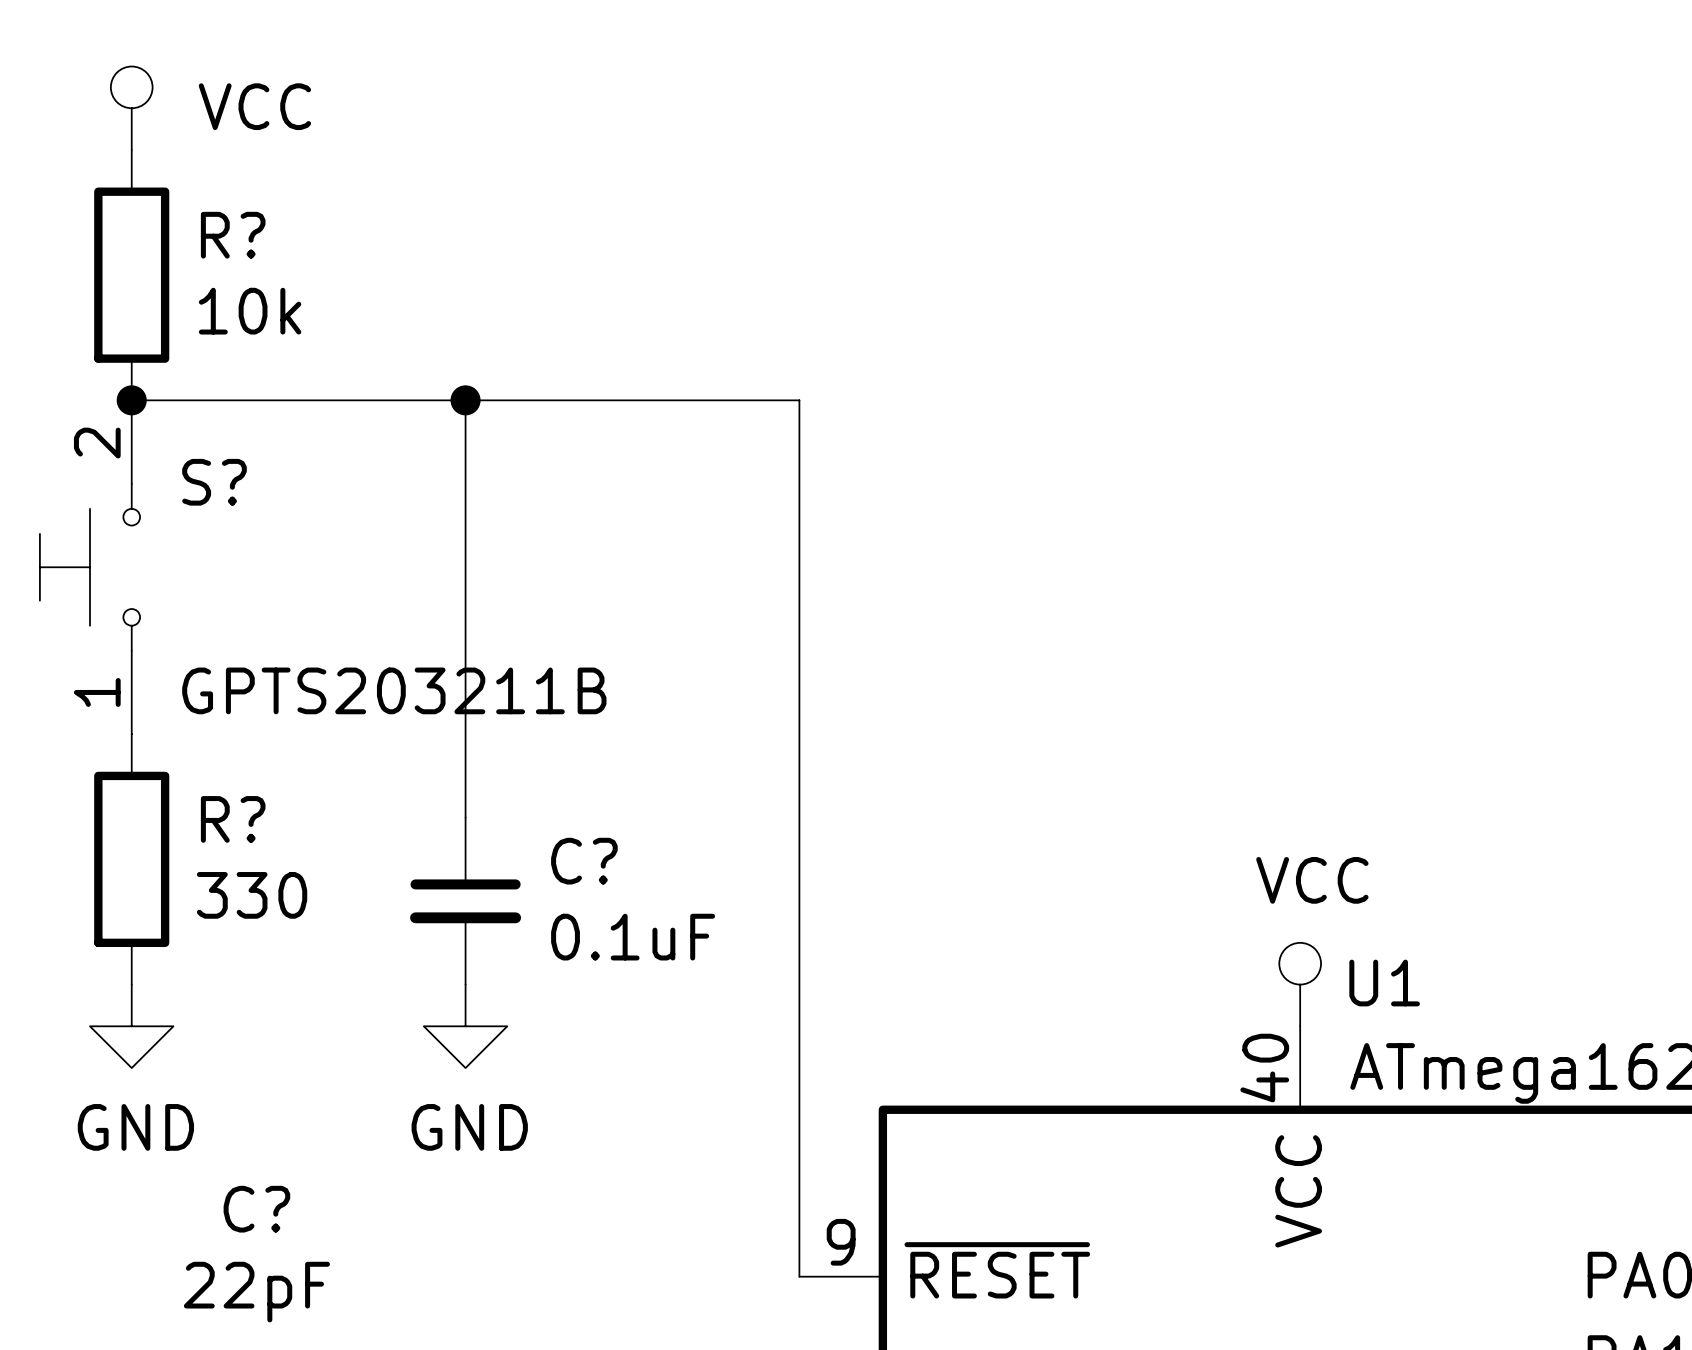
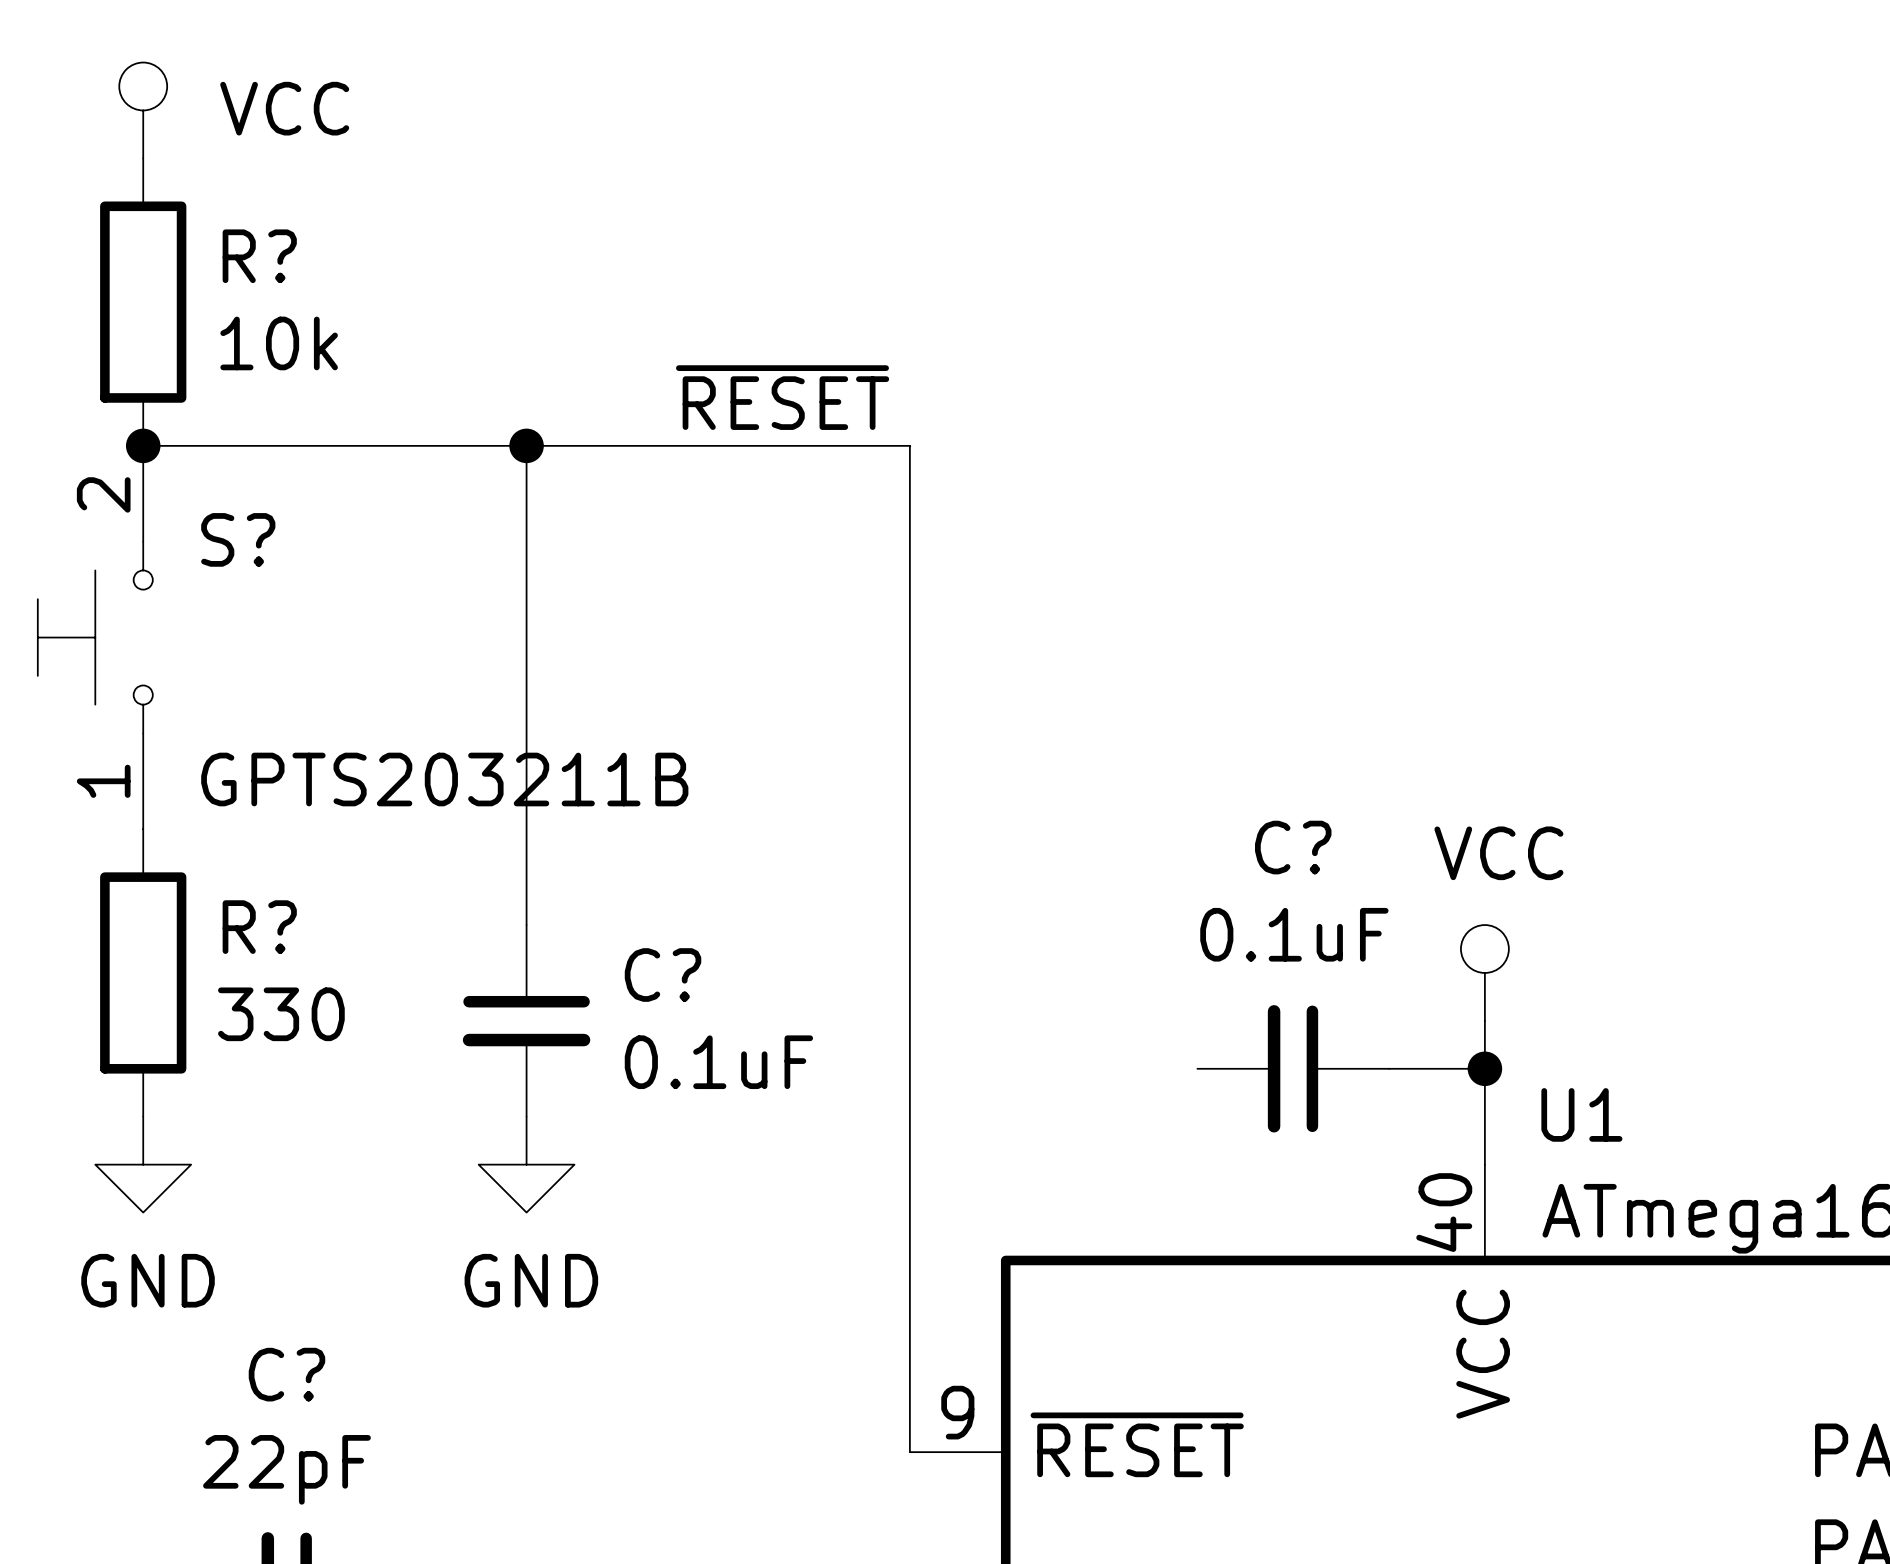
label: none -> ~{RESET} (782, 397)
wire: none -> (1484, 1020) (1484, 1164)
C?: none -> 0.1uF (1293, 1068)
wire: none -> (1389, 1068) (1484, 1068)
junction: none -> (1484, 1068)
power symbol position: VCC (1300, 984) -> VCC (1484, 972)

